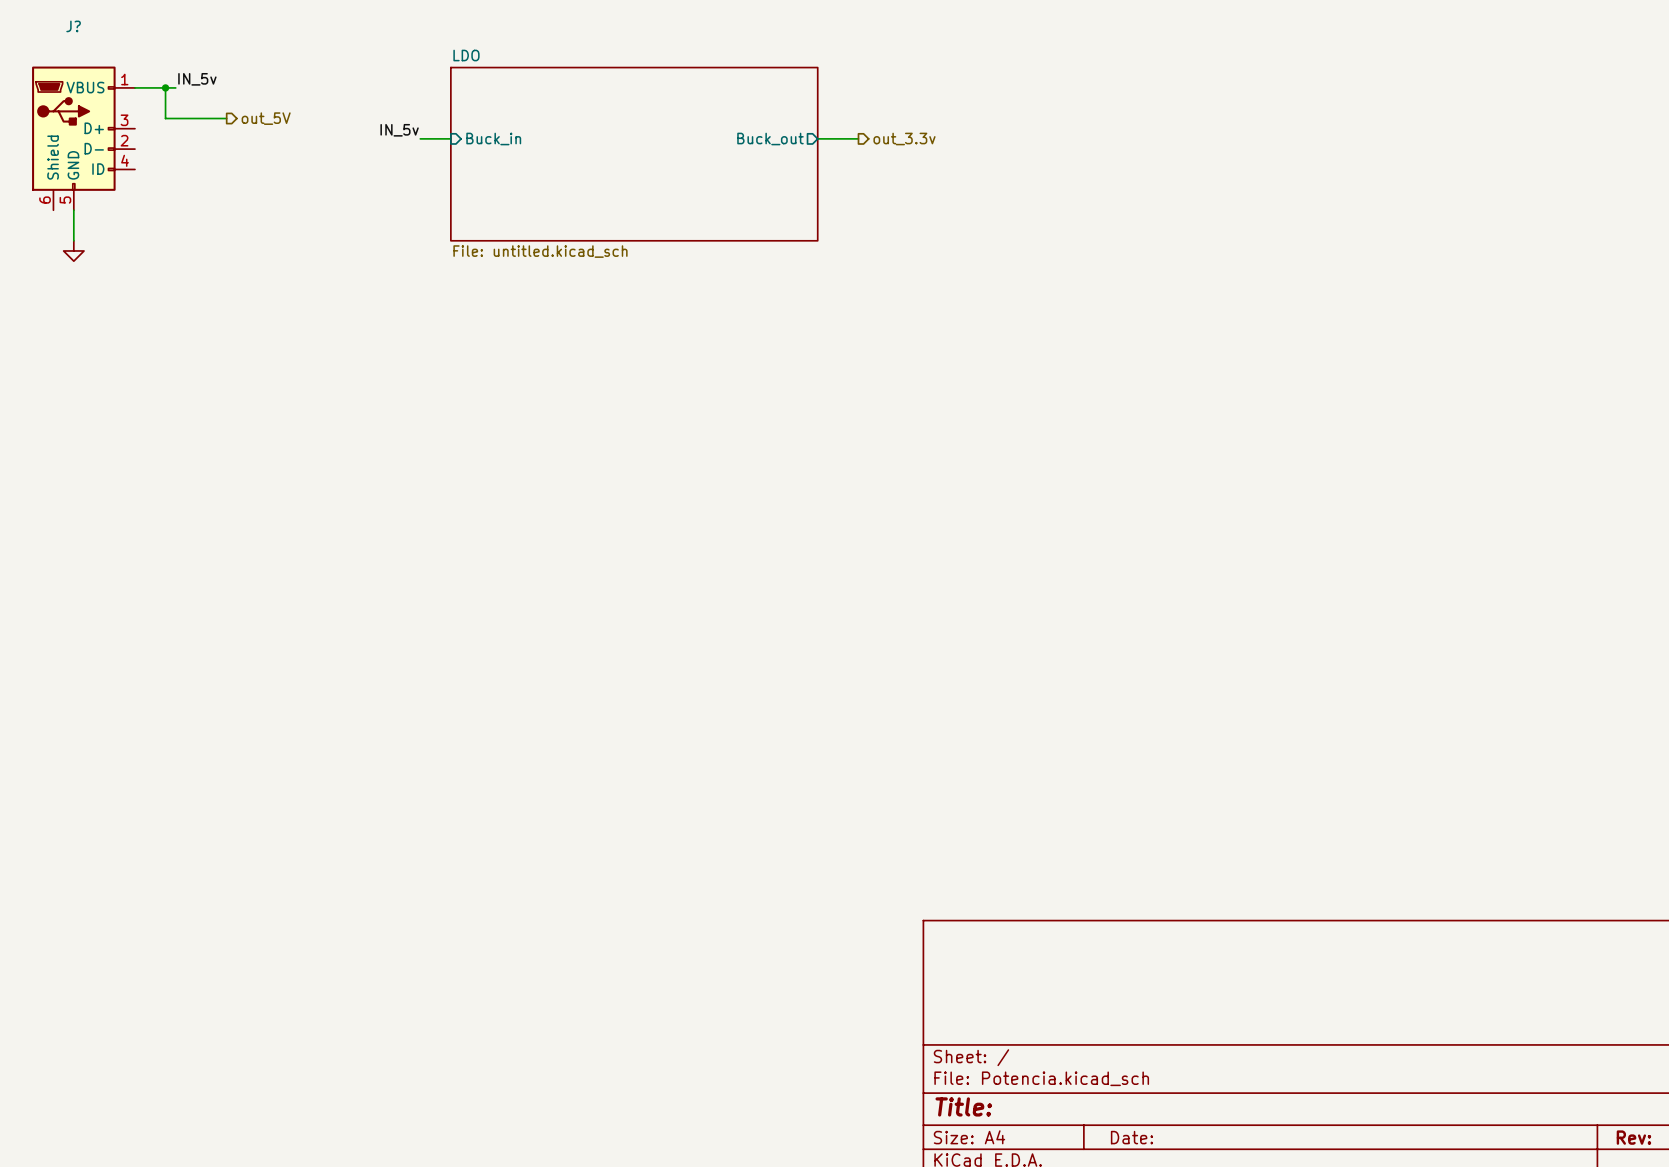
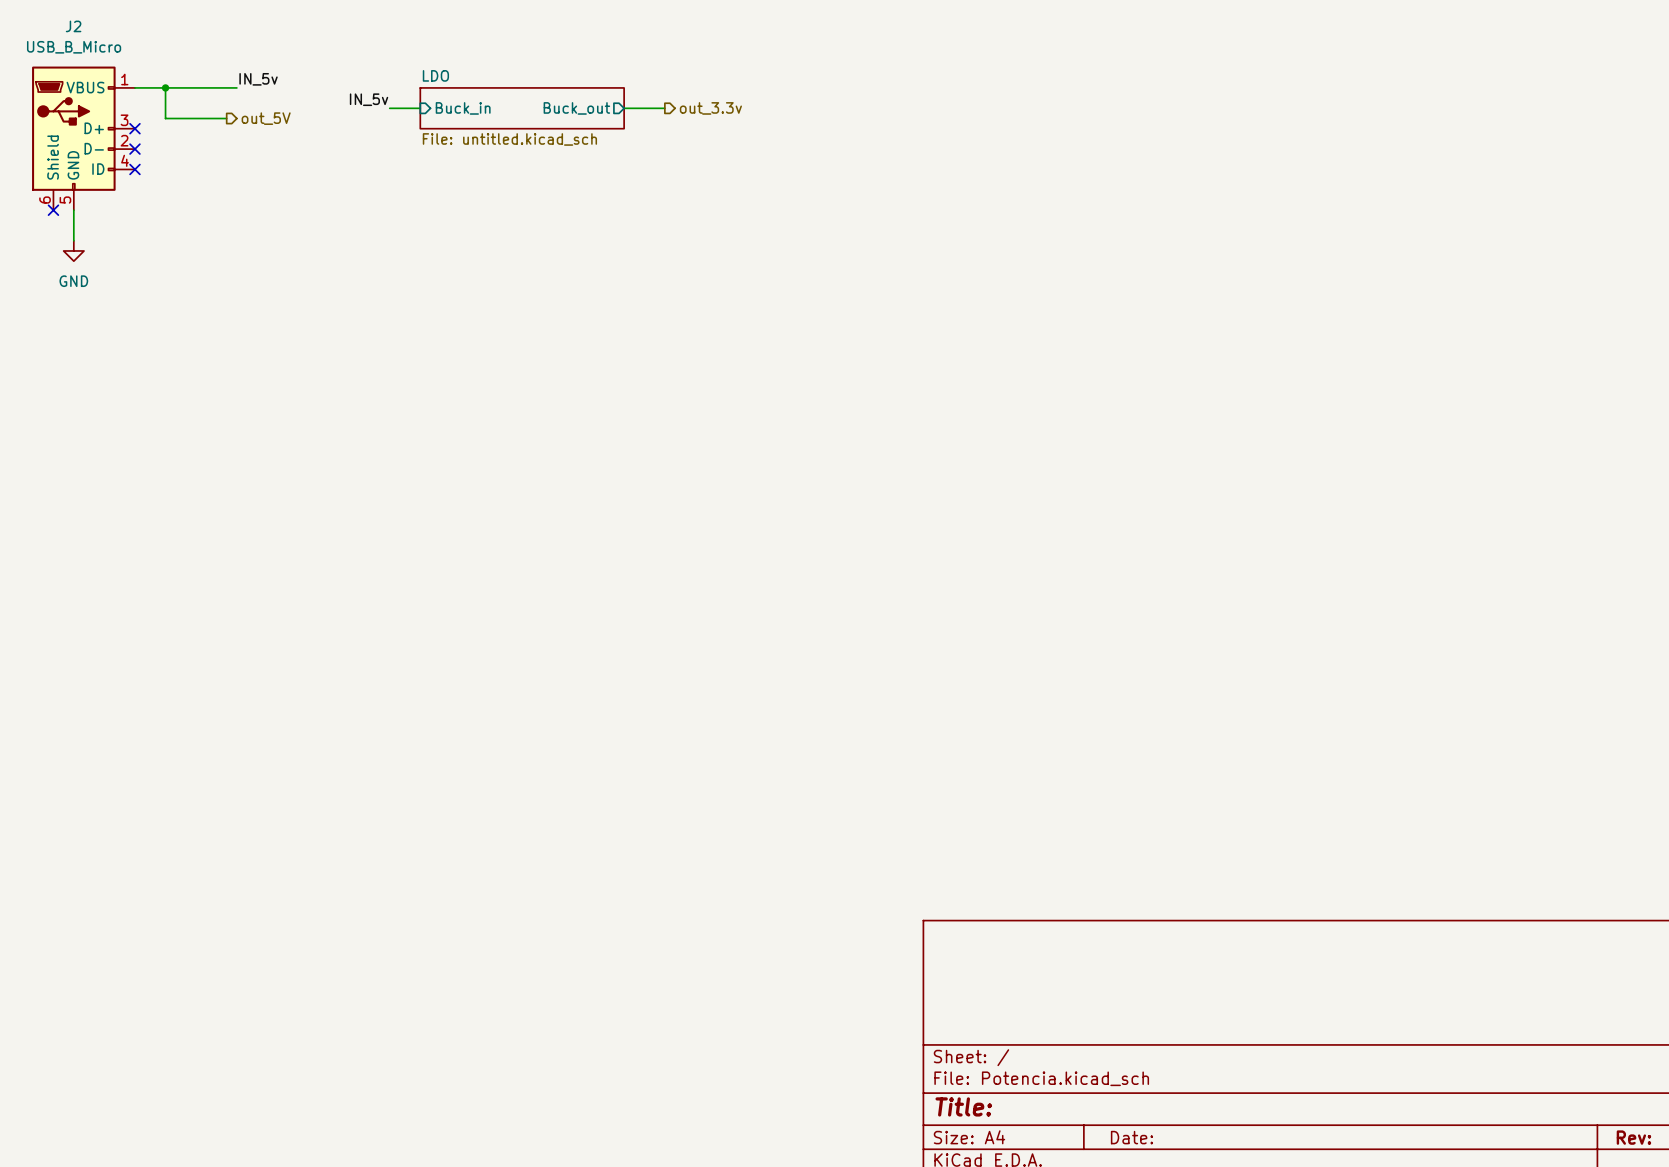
J? name: J? (73, 26) -> J2 (73, 26)
J? value: none -> USB_B_Micro (74, 47)
label position: IN_5v (197, 79) -> IN_5v (258, 79)
wire: none -> (175, 87) (236, 87)
sheet LDO: none -> File: untitled.kicad_sch (522, 108)
no-connect mark: none -> (134, 128)
label position: IN_5v (399, 130) -> IN_5v (369, 99)
wire: (420, 138) (450, 138) -> (389, 108) (420, 108)
wire: (817, 138) (858, 138) -> (624, 108) (664, 108)
sheet pin position: Buck_in (493, 139) -> Buck_in (463, 108)
sheet pin position: Buck_out (770, 139) -> Buck_out (576, 108)
hierarchical label position: out_3.3v (904, 139) -> out_3.3v (710, 108)
no-connect mark: none -> (134, 149)
sheet LDO: File: untitled.kicad_sch (634, 154) -> none
no-connect mark: none -> (134, 169)
no-connect mark: none -> (53, 210)
power symbol text: none -> GND (73, 281)

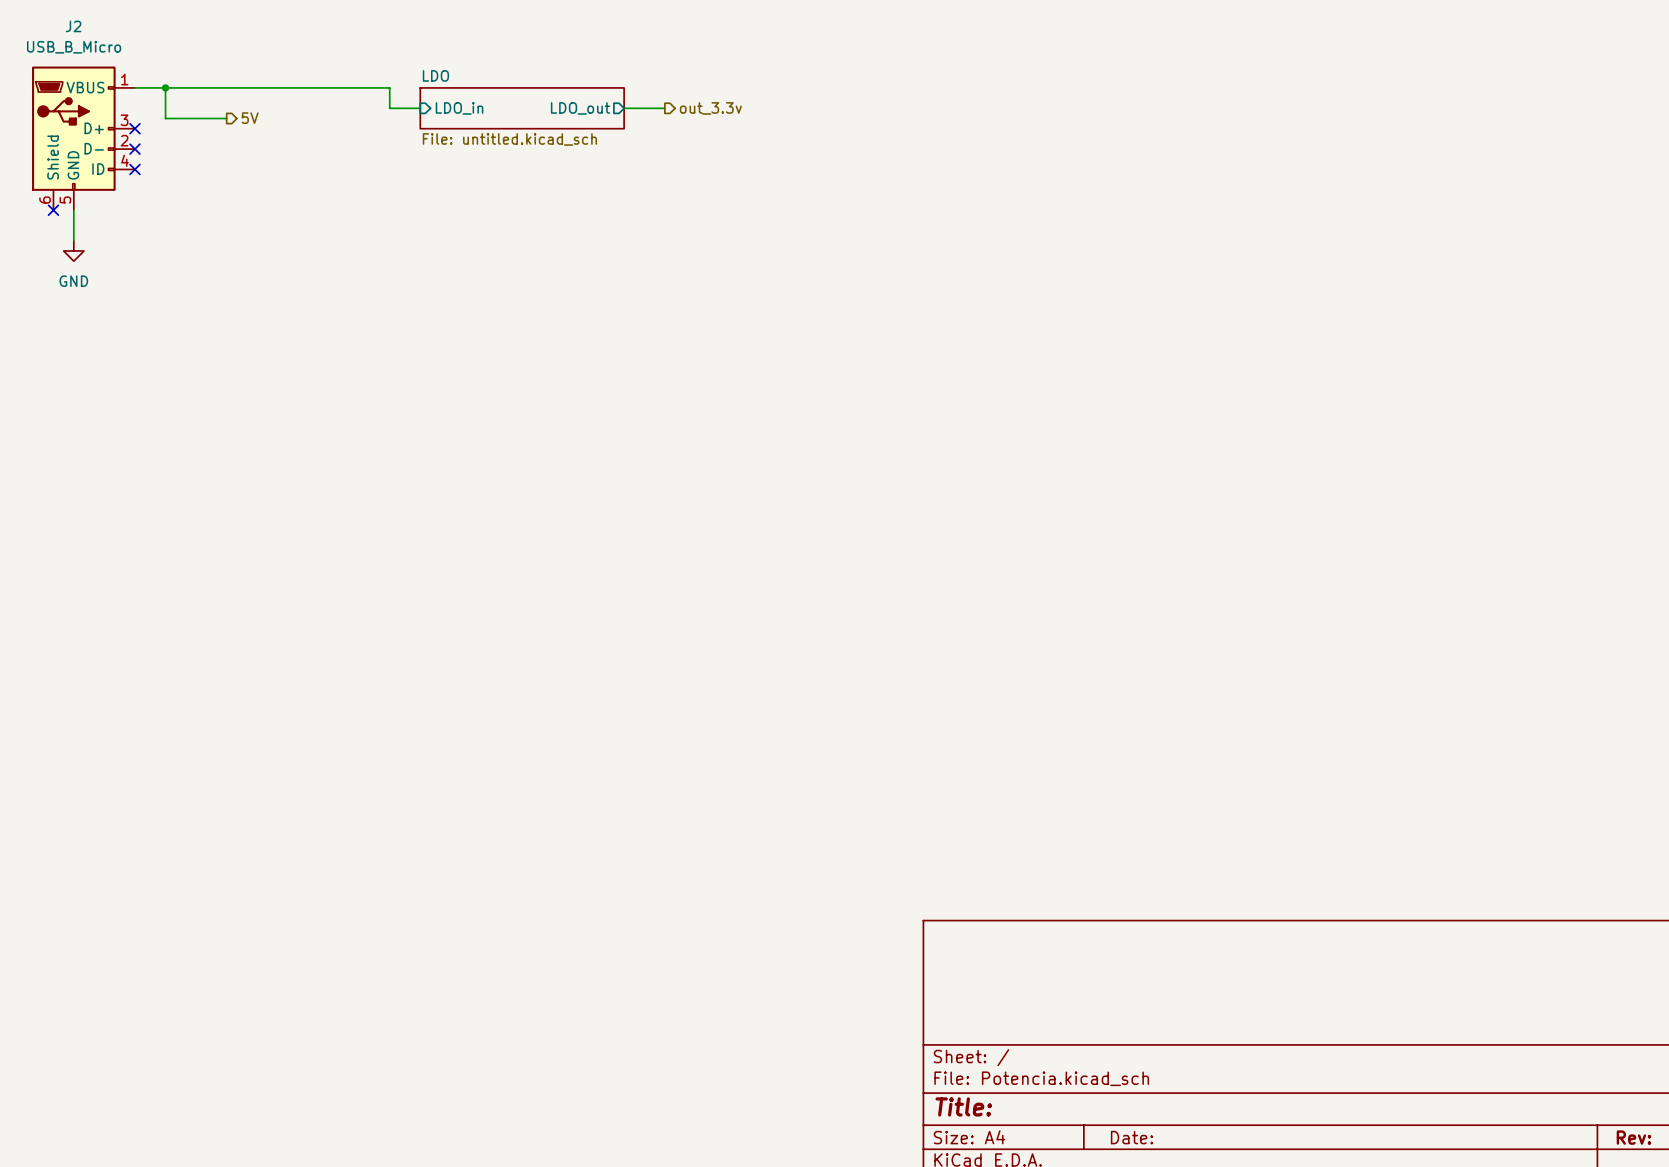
label: IN_5v (258, 79) -> none
wire: none -> (236, 87) (389, 87) (389, 108)
label: IN_5v (369, 99) -> none
sheet pin: Buck_in (463, 108) -> LDO_in (459, 108)
sheet pin: Buck_out (576, 108) -> LDO_out (580, 108)
hierarchical label: out_5V (266, 118) -> 5V (250, 118)

